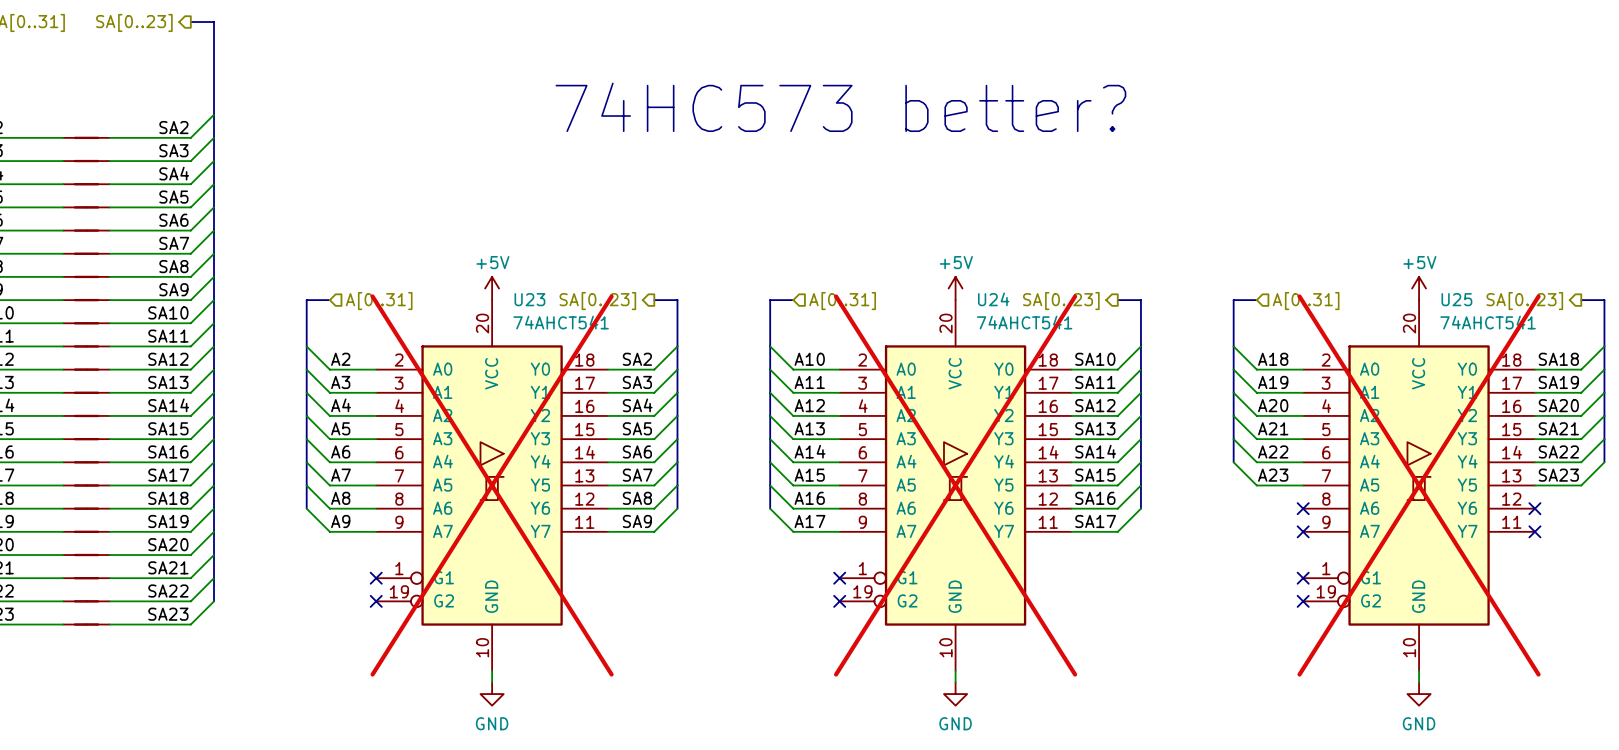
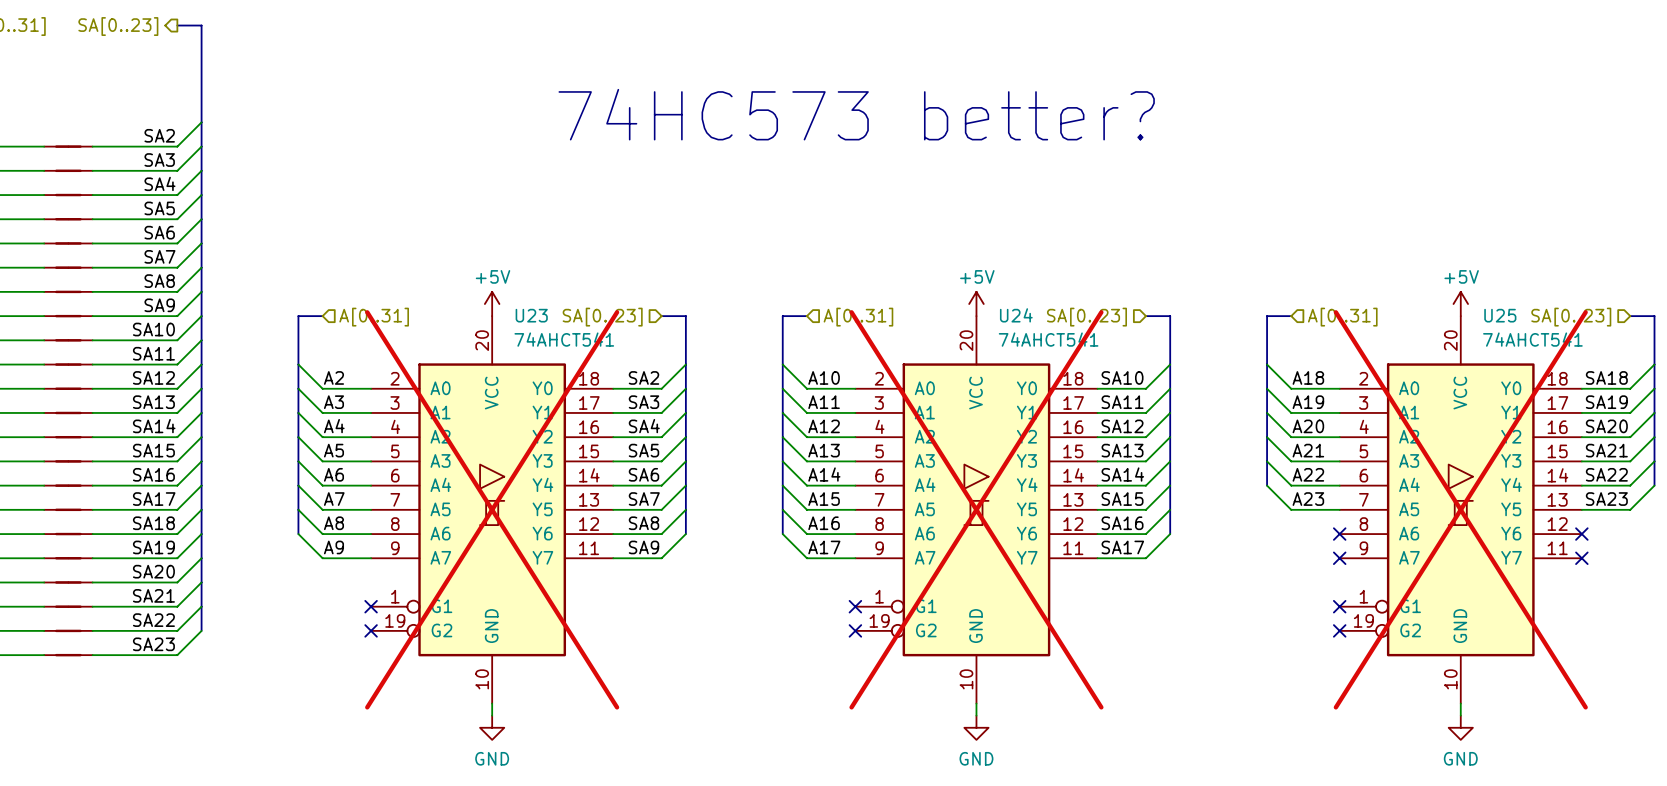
hierarchical label shape: output (597, 301) -> input (602, 317)
hierarchical label shape: output (1061, 301) -> input (1086, 317)
hierarchical label shape: output (1524, 301) -> input (1571, 317)

